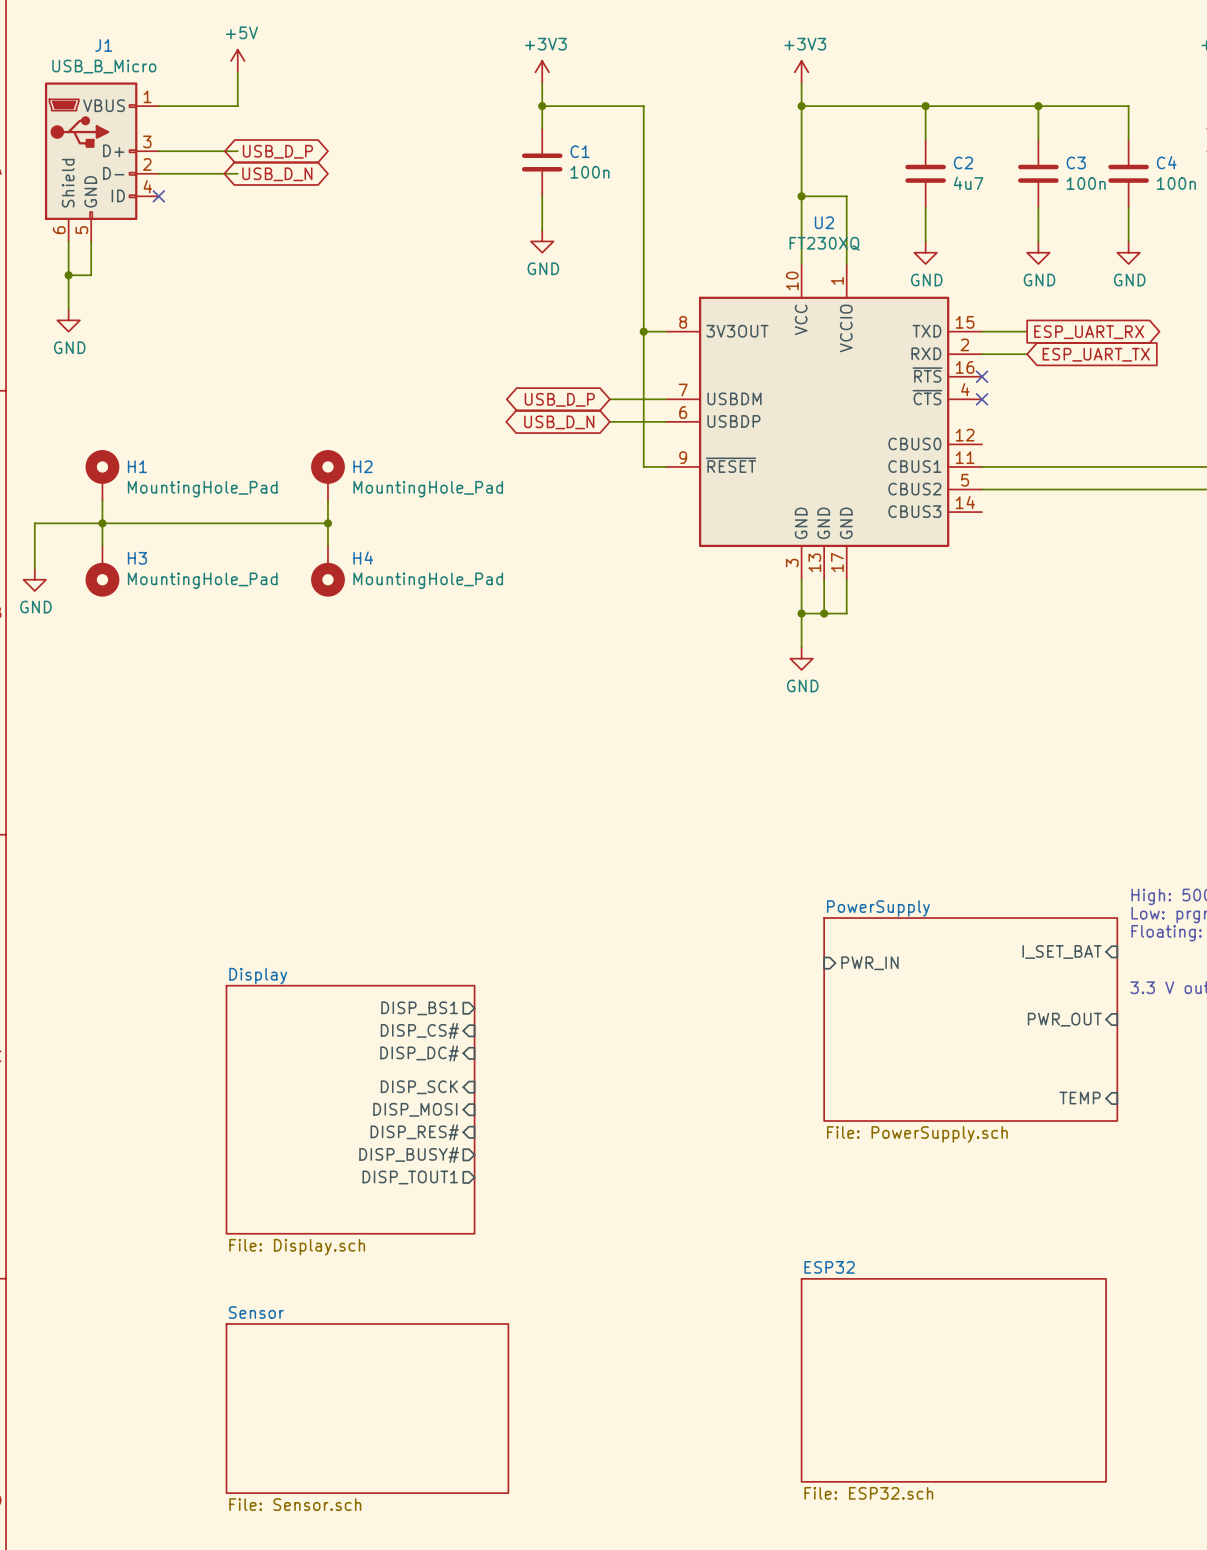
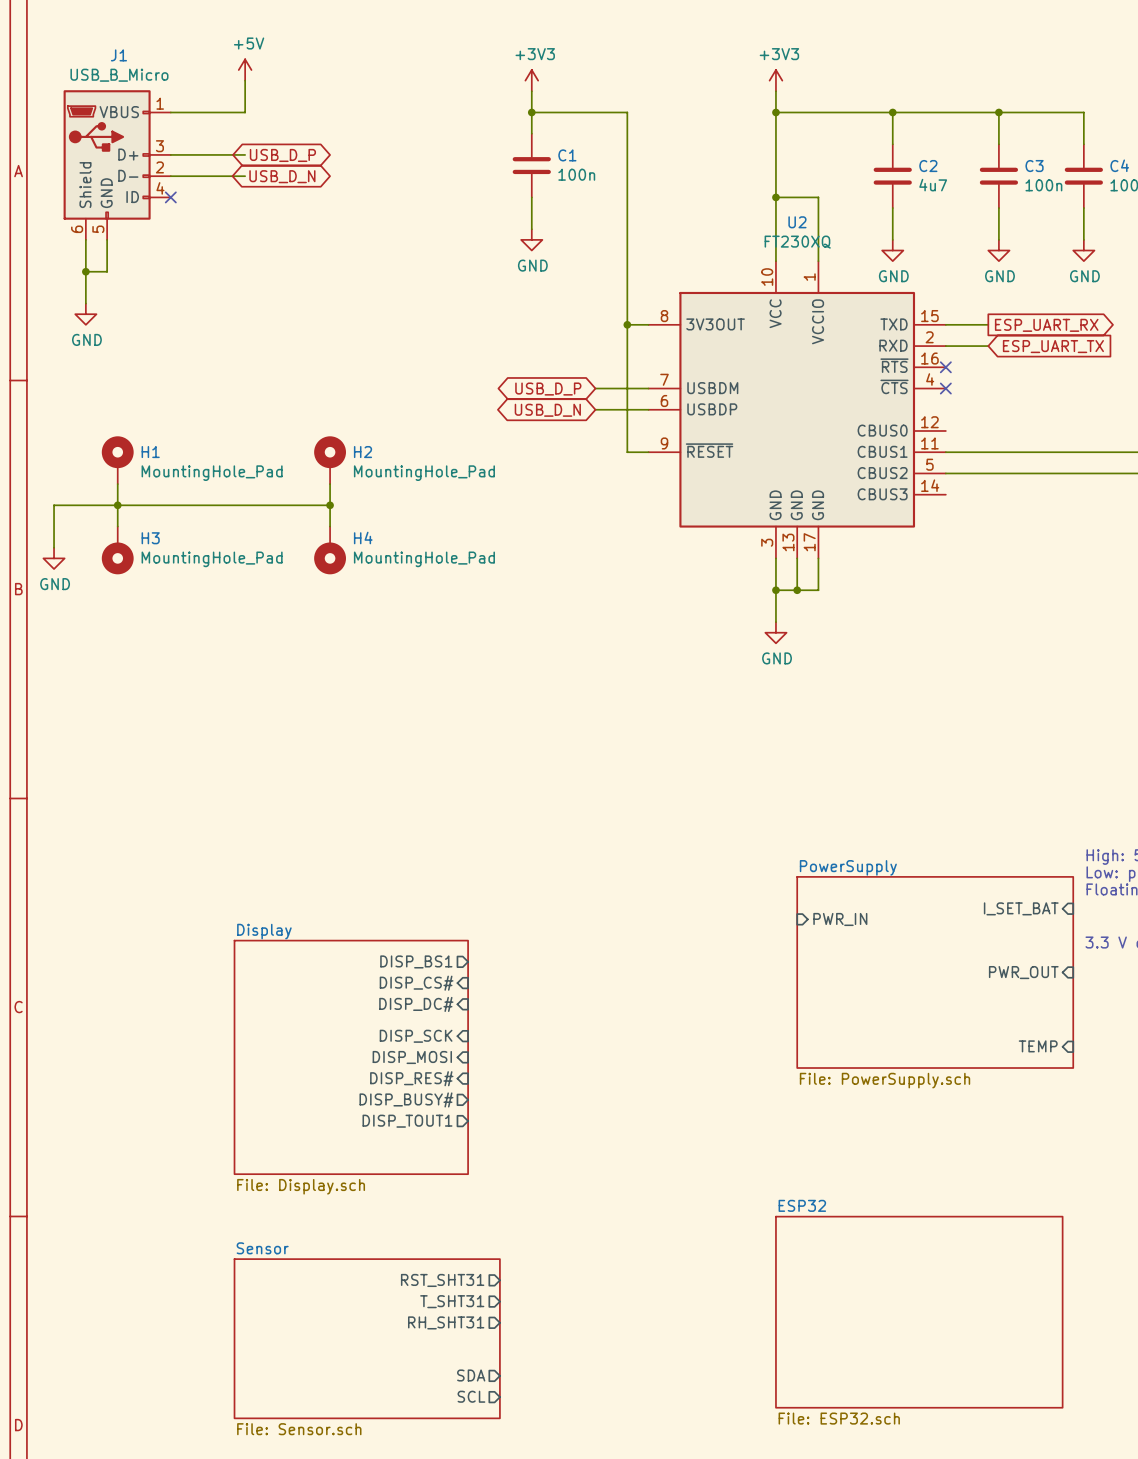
sheet pin: none -> RST_SHT31 (442, 1280)
sheet pin: none -> T_SHT31 (452, 1301)
sheet pin: none -> RH_SHT31 (446, 1322)
sheet pin: none -> SDA (471, 1375)
sheet pin: none -> SCL (471, 1396)

